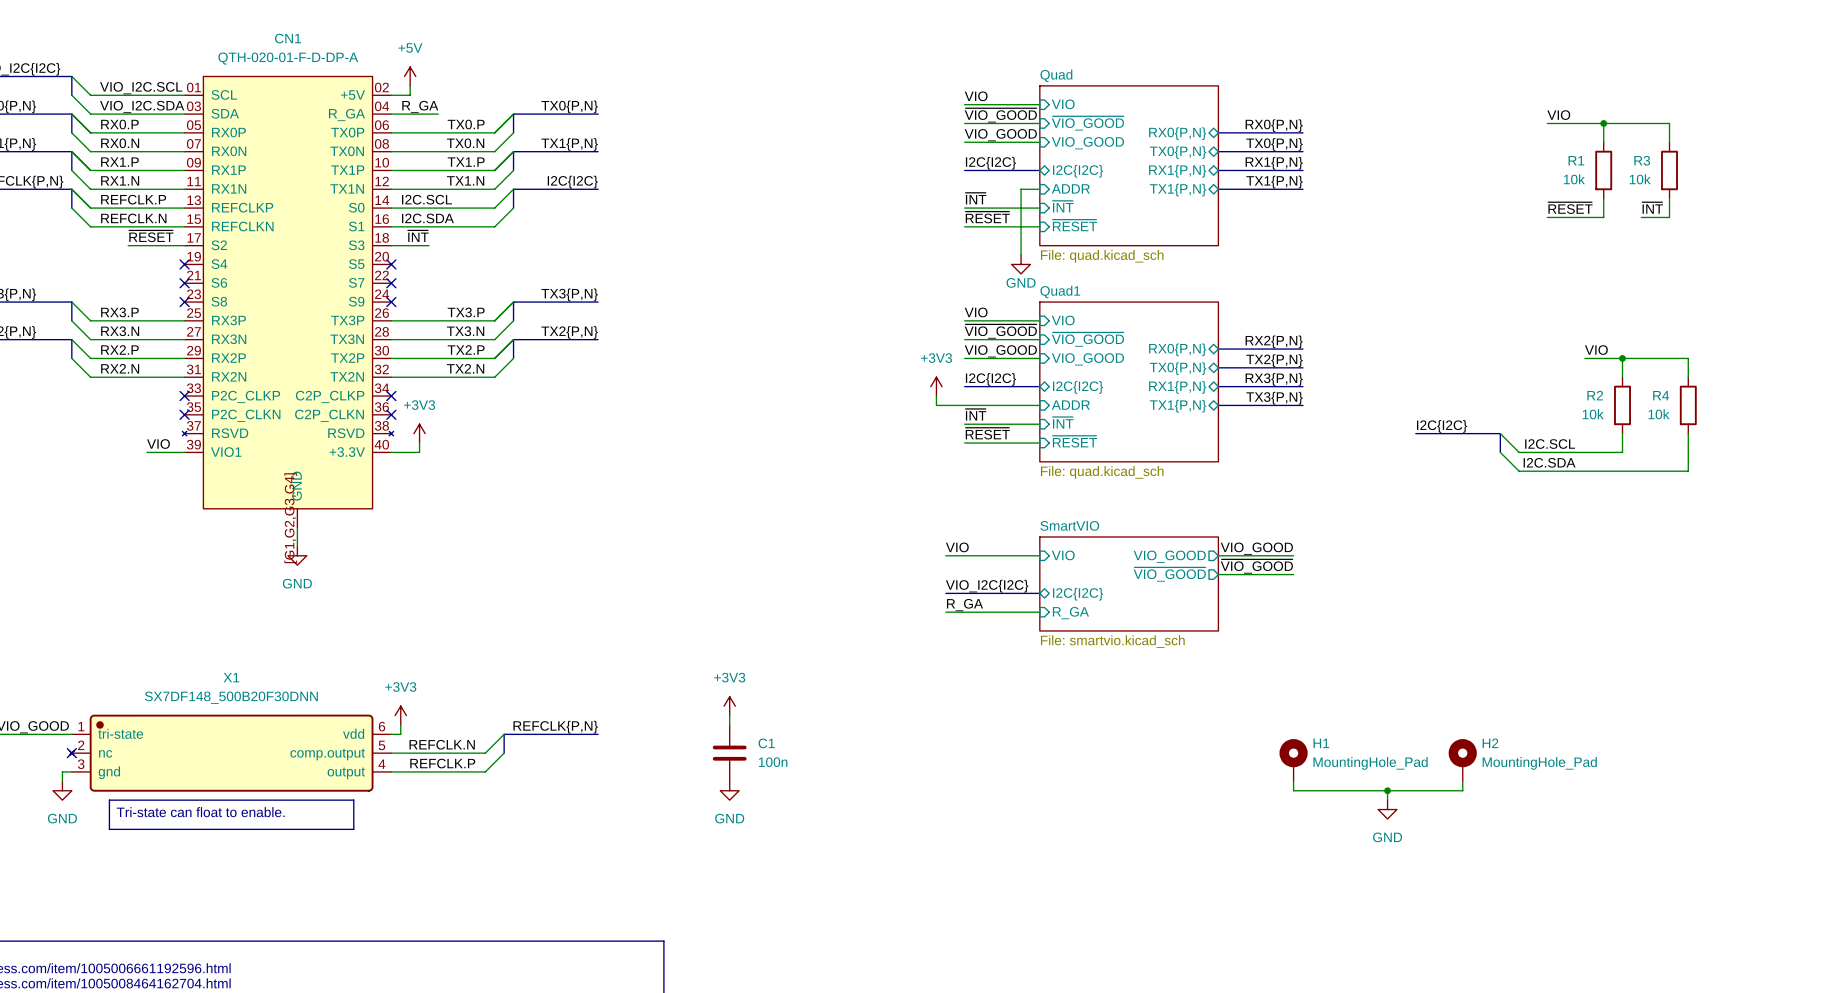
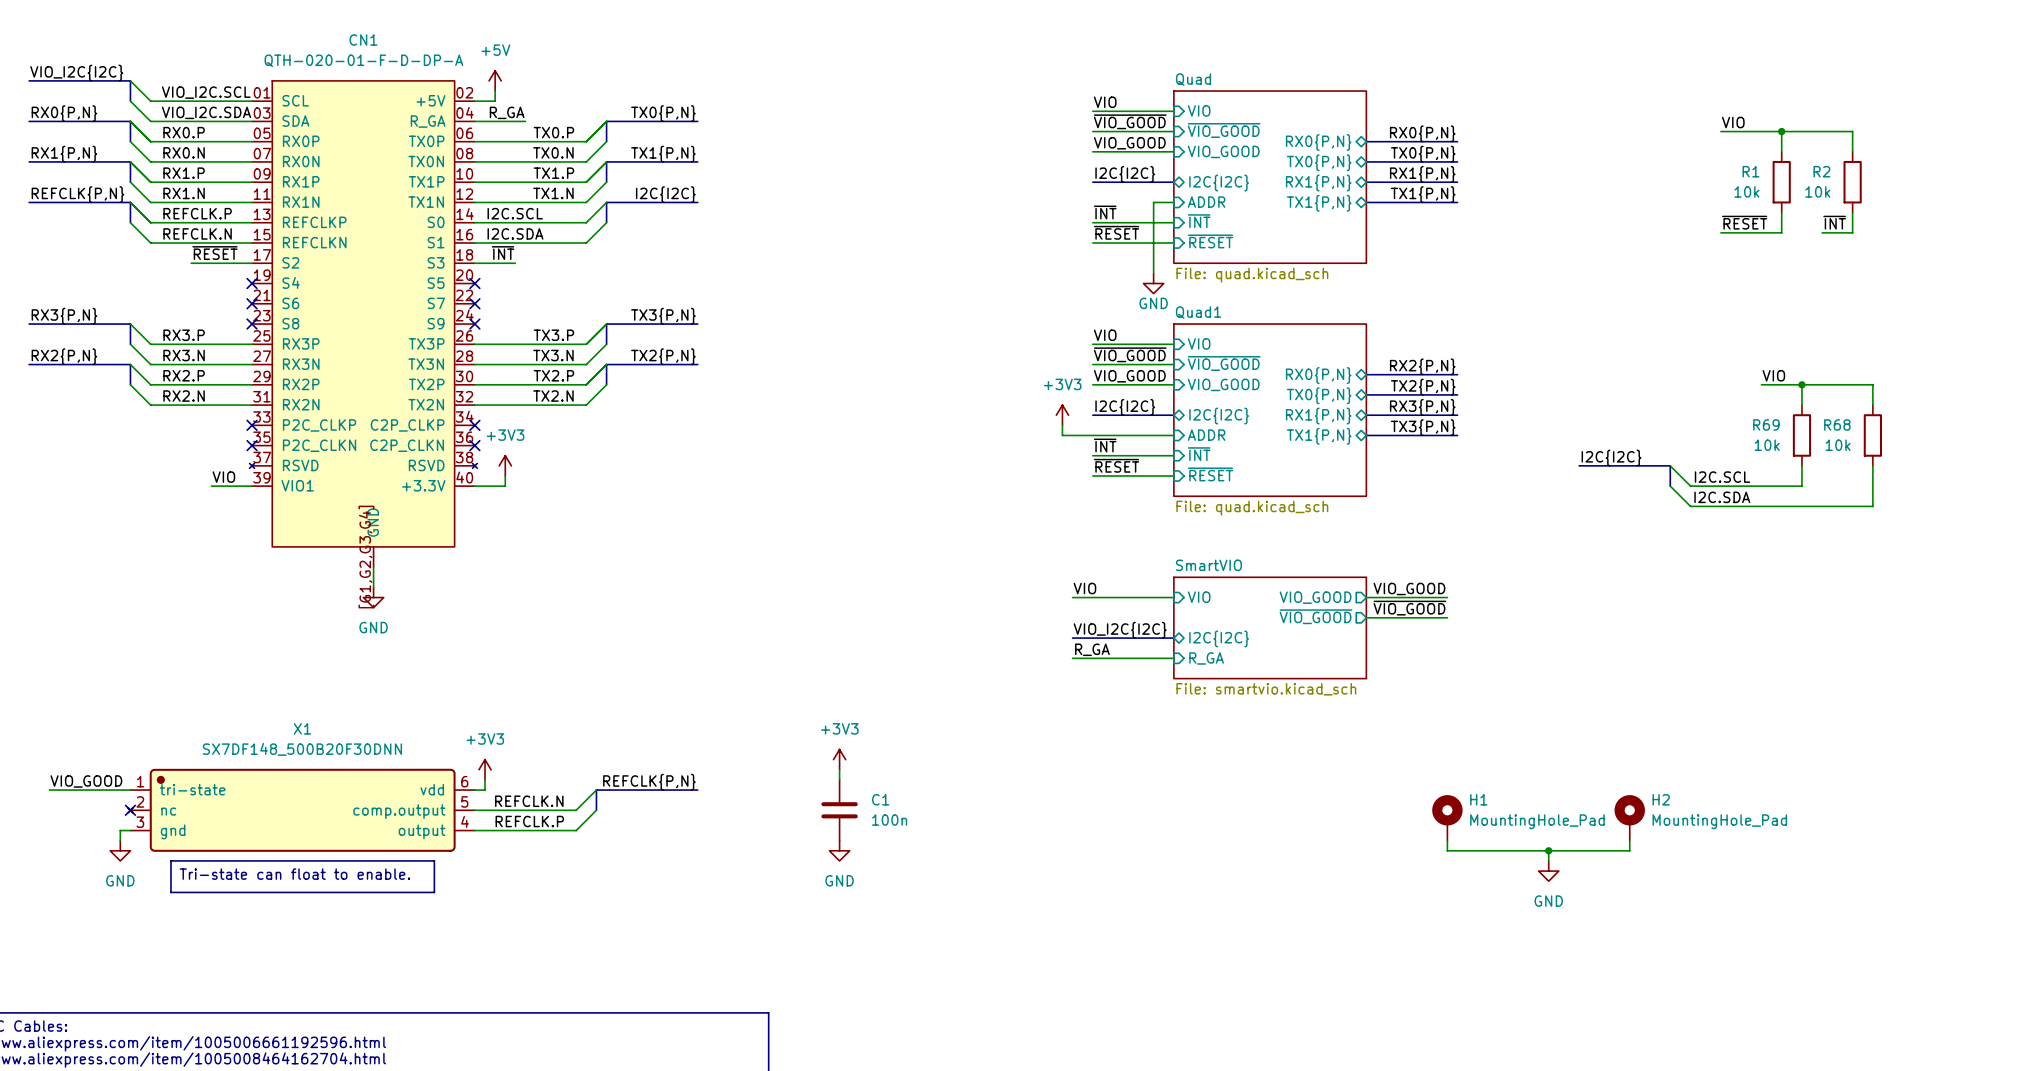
R3 name: R3 (1642, 160) -> R2 (1821, 171)
R2 name: R2 (1595, 395) -> R69 (1766, 424)
R4 name: R4 (1661, 395) -> R68 (1837, 424)

